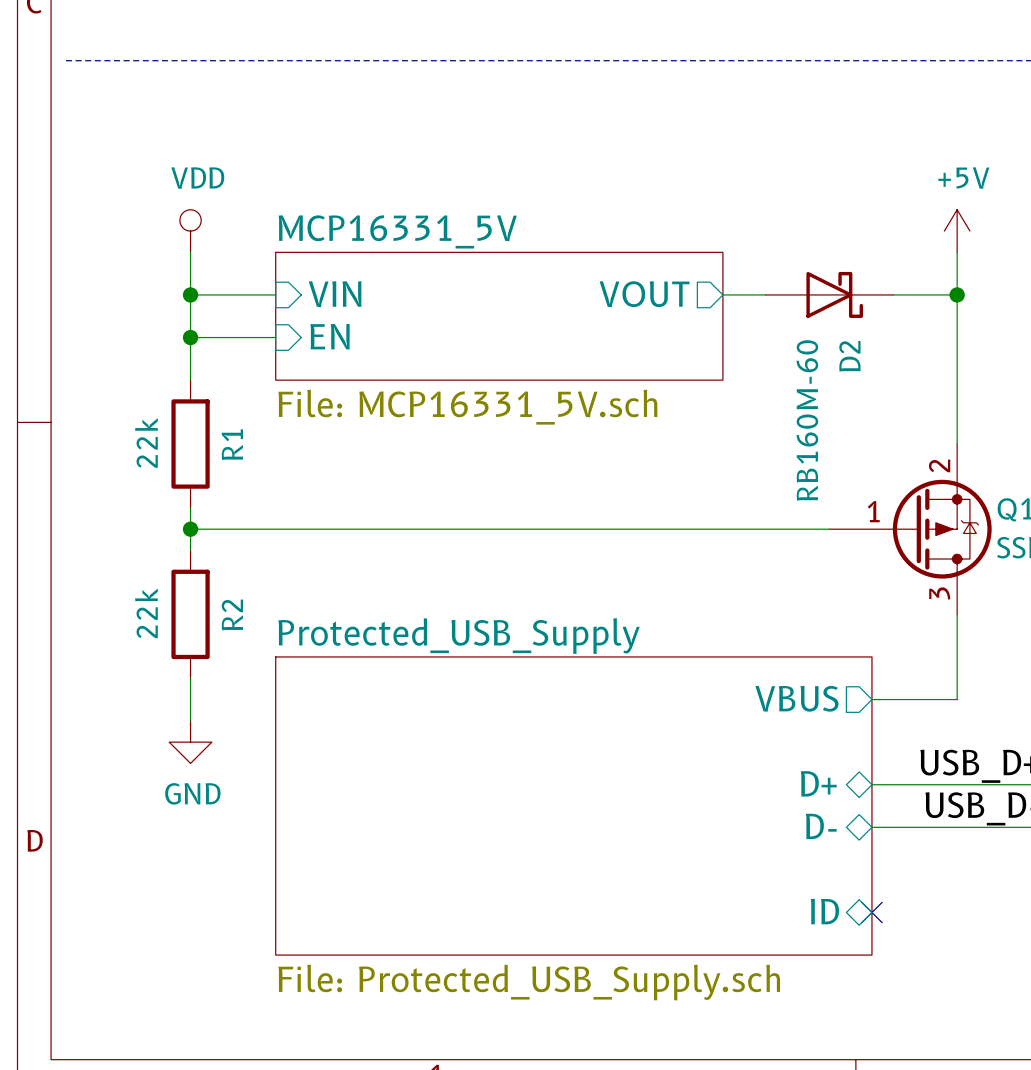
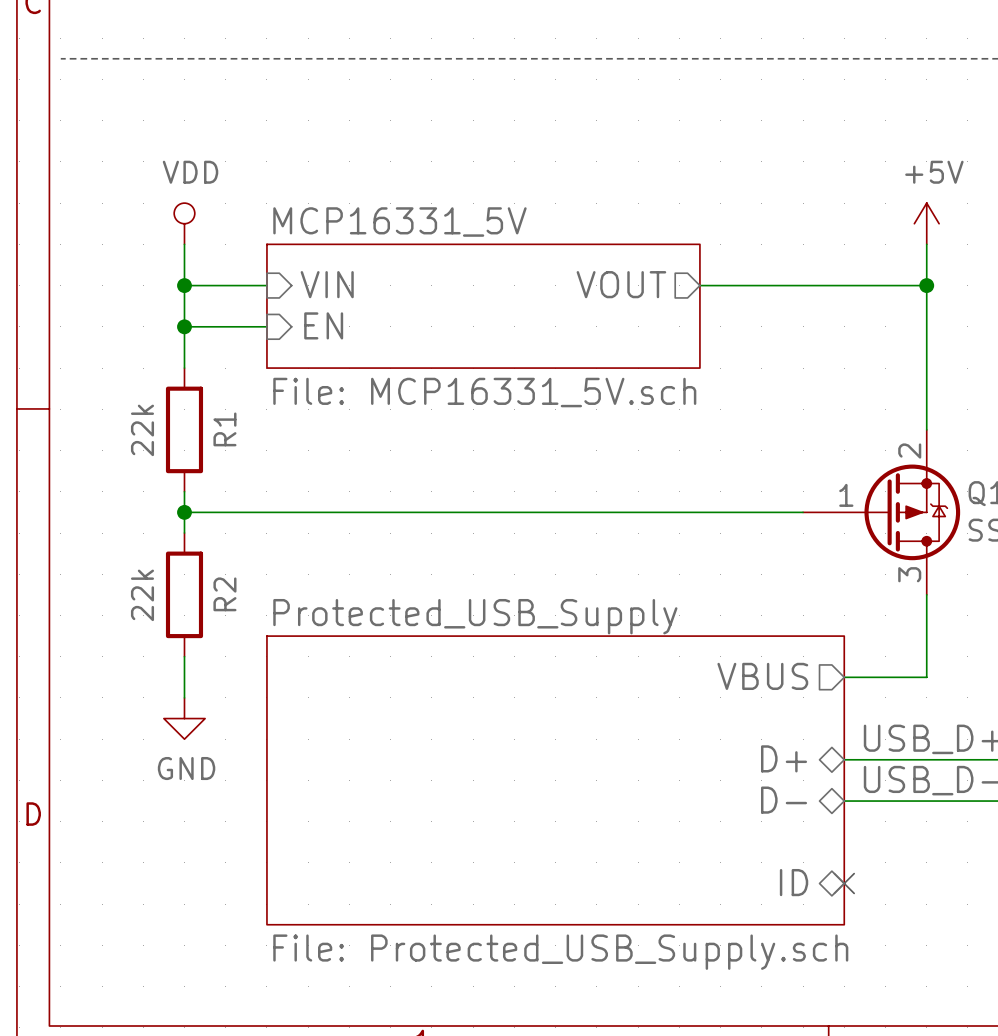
D2: RB160M-60 (829, 294) -> none

